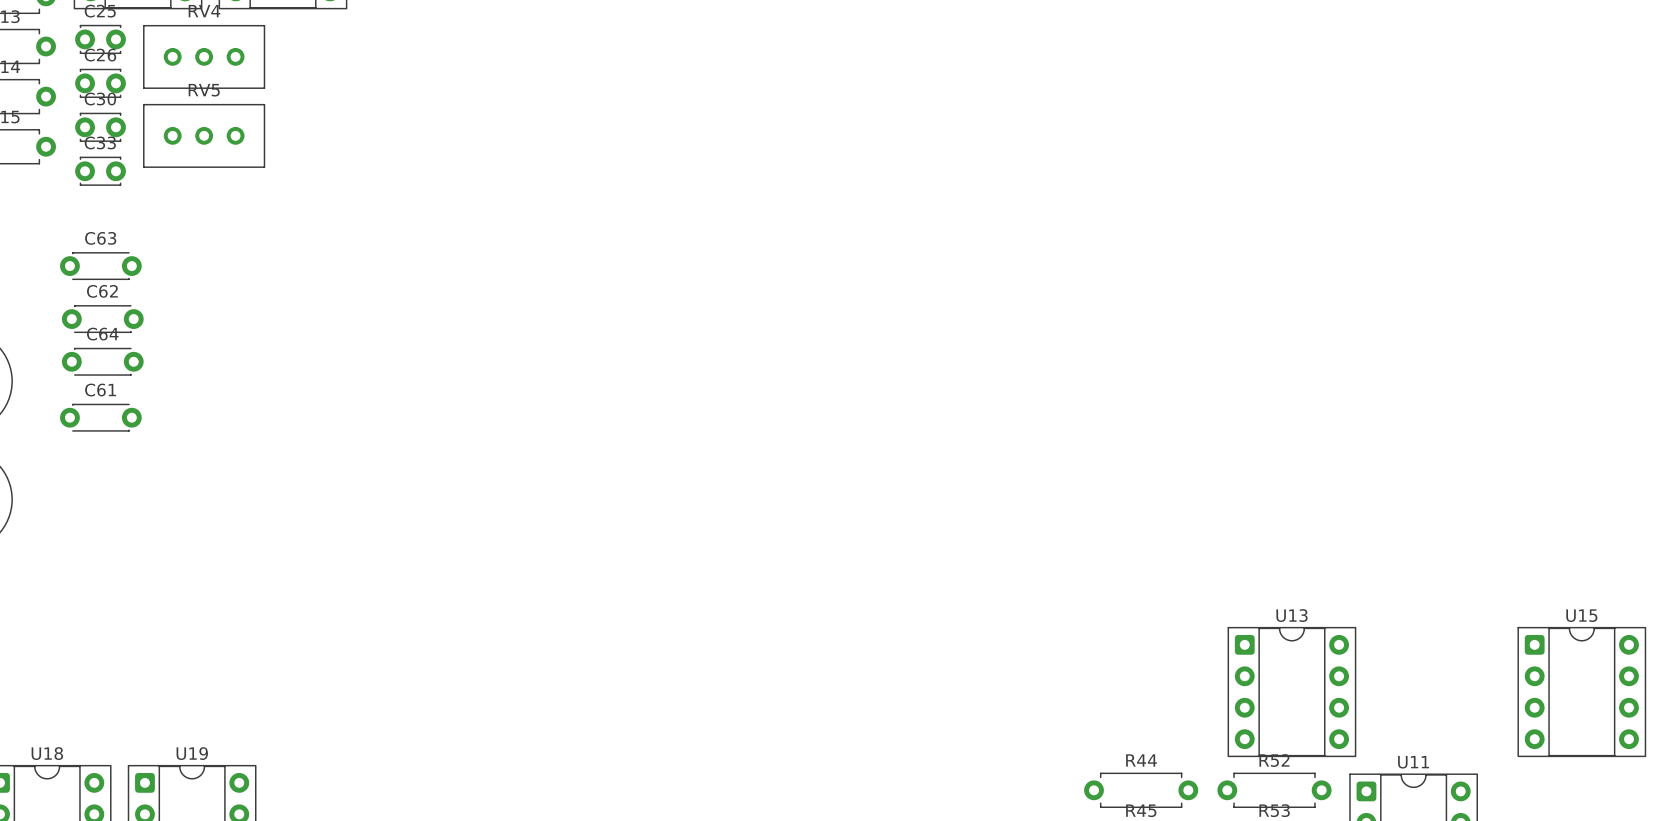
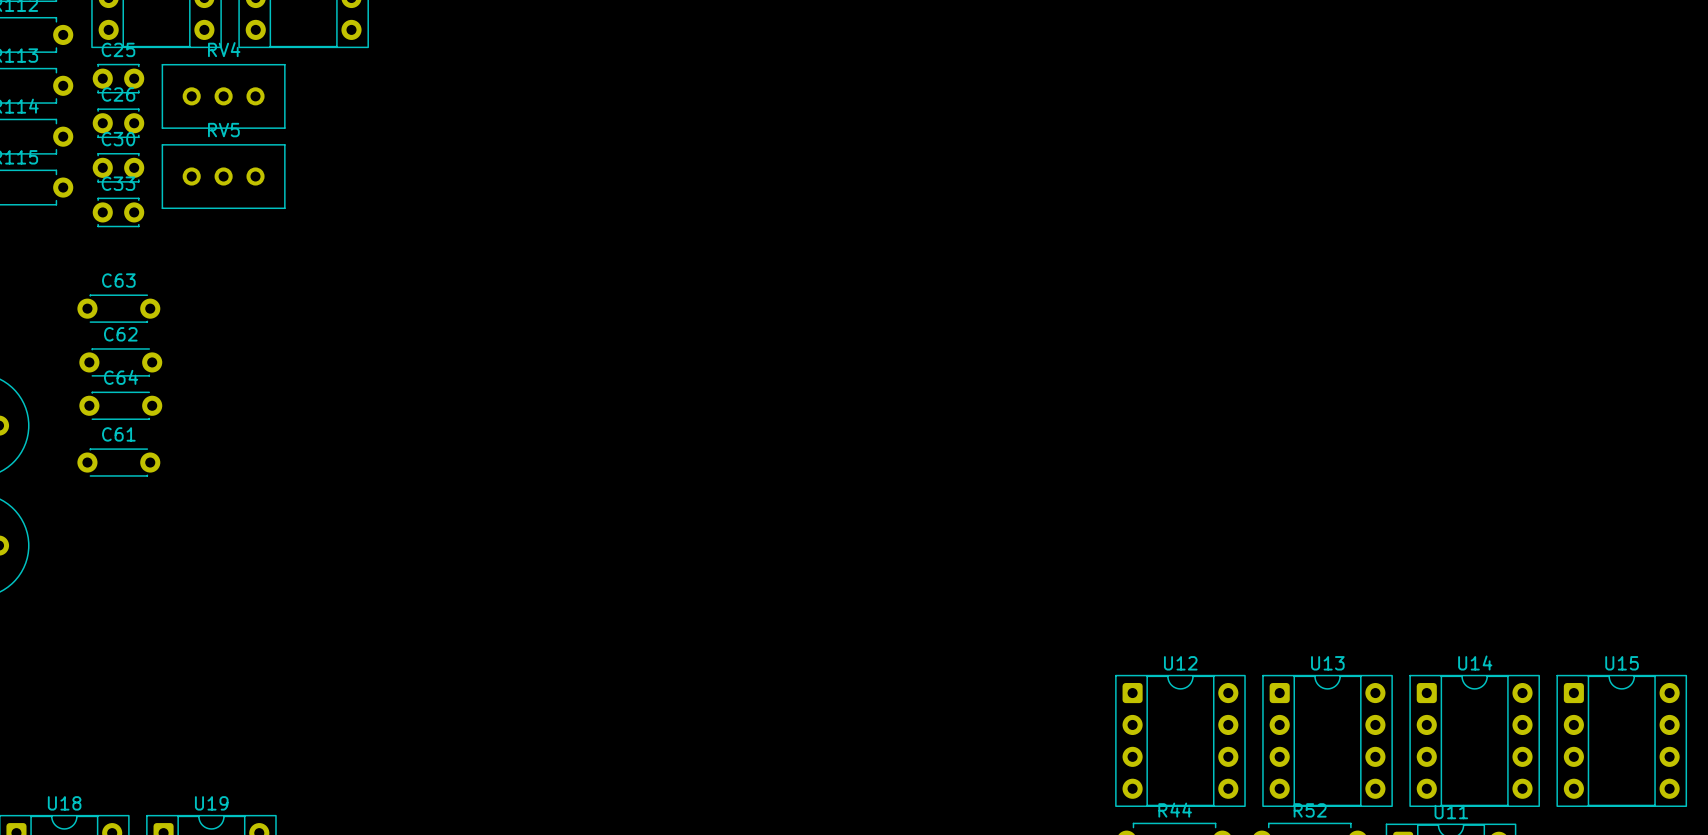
U12: none -> (1180, 740)
U14: none -> (1474, 740)

